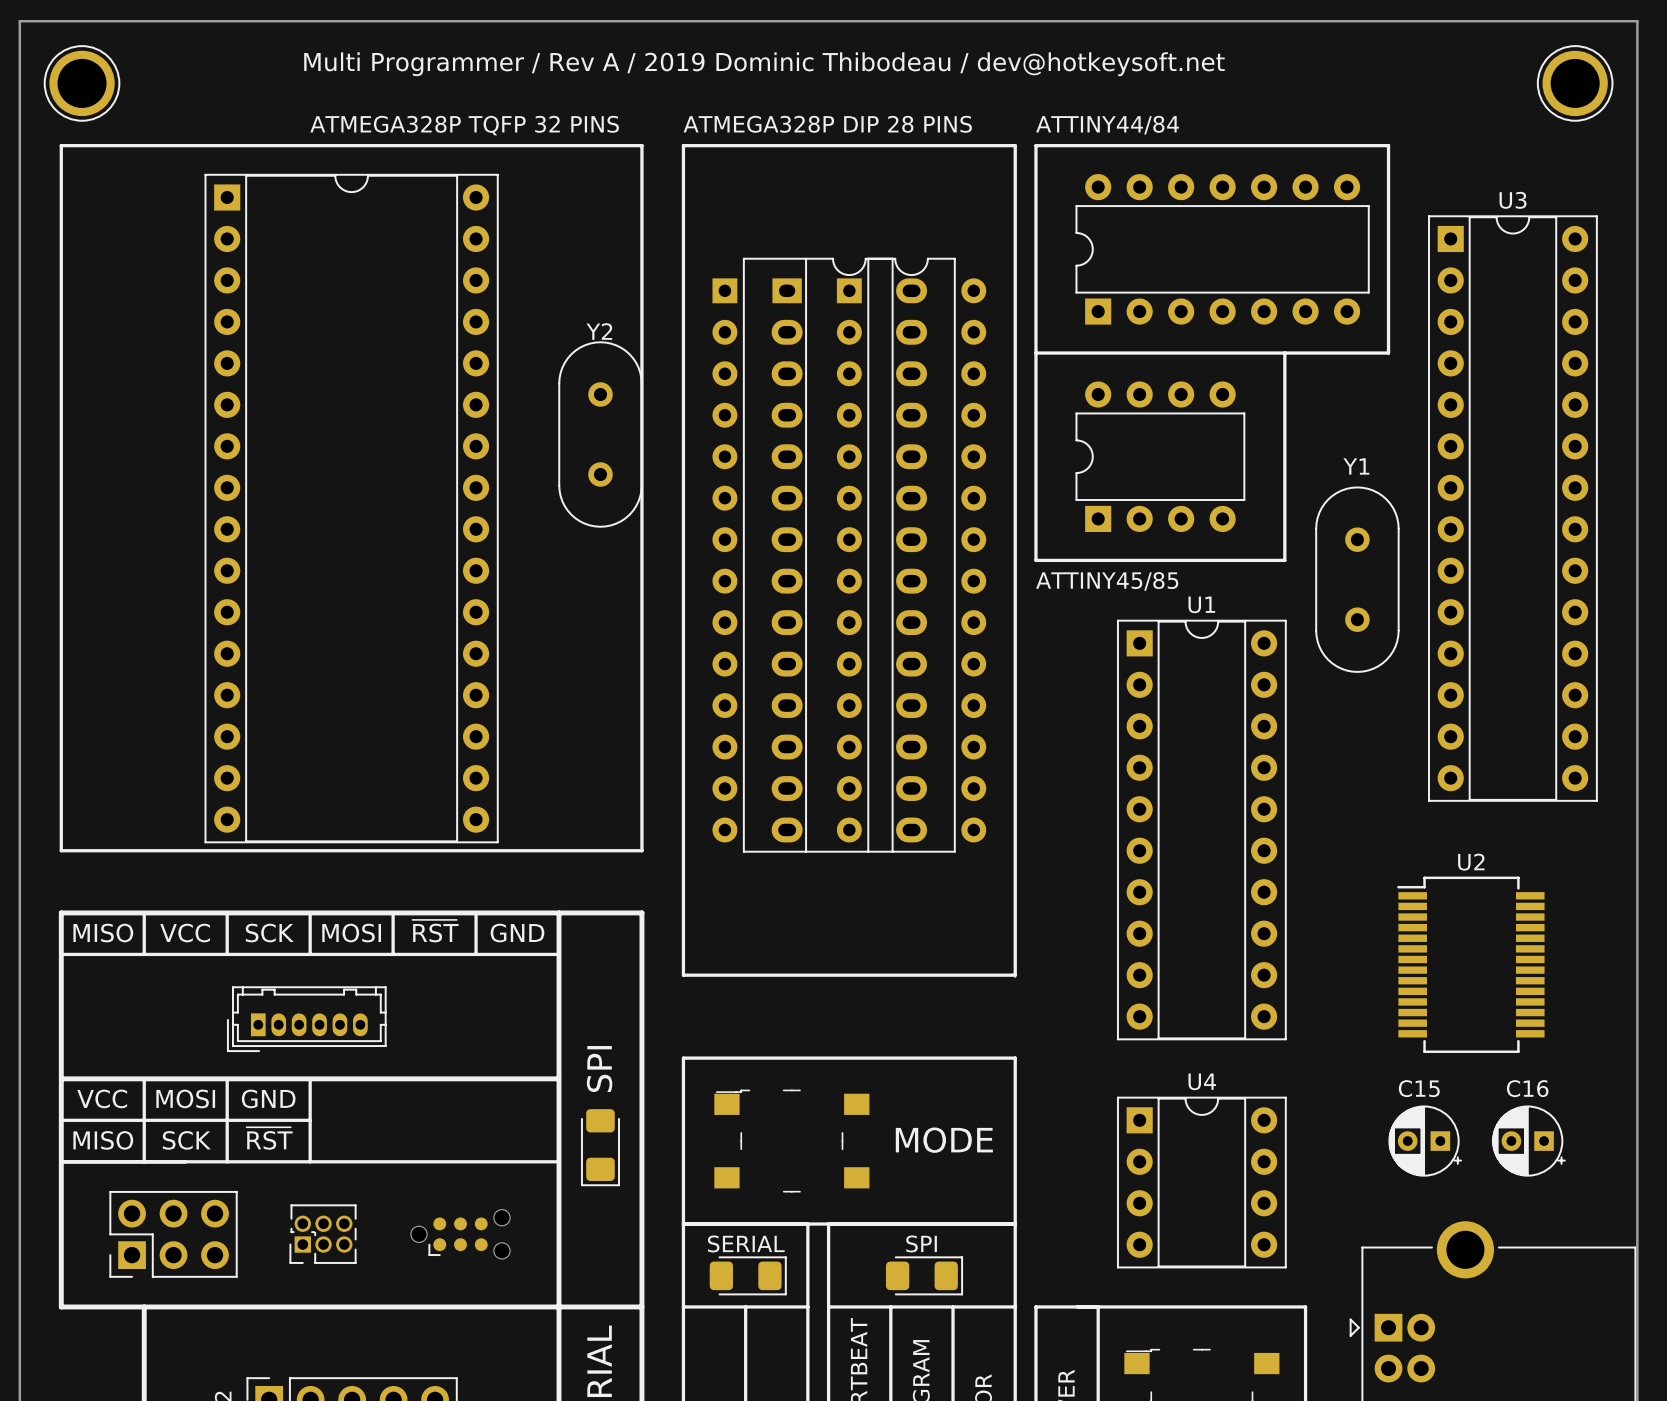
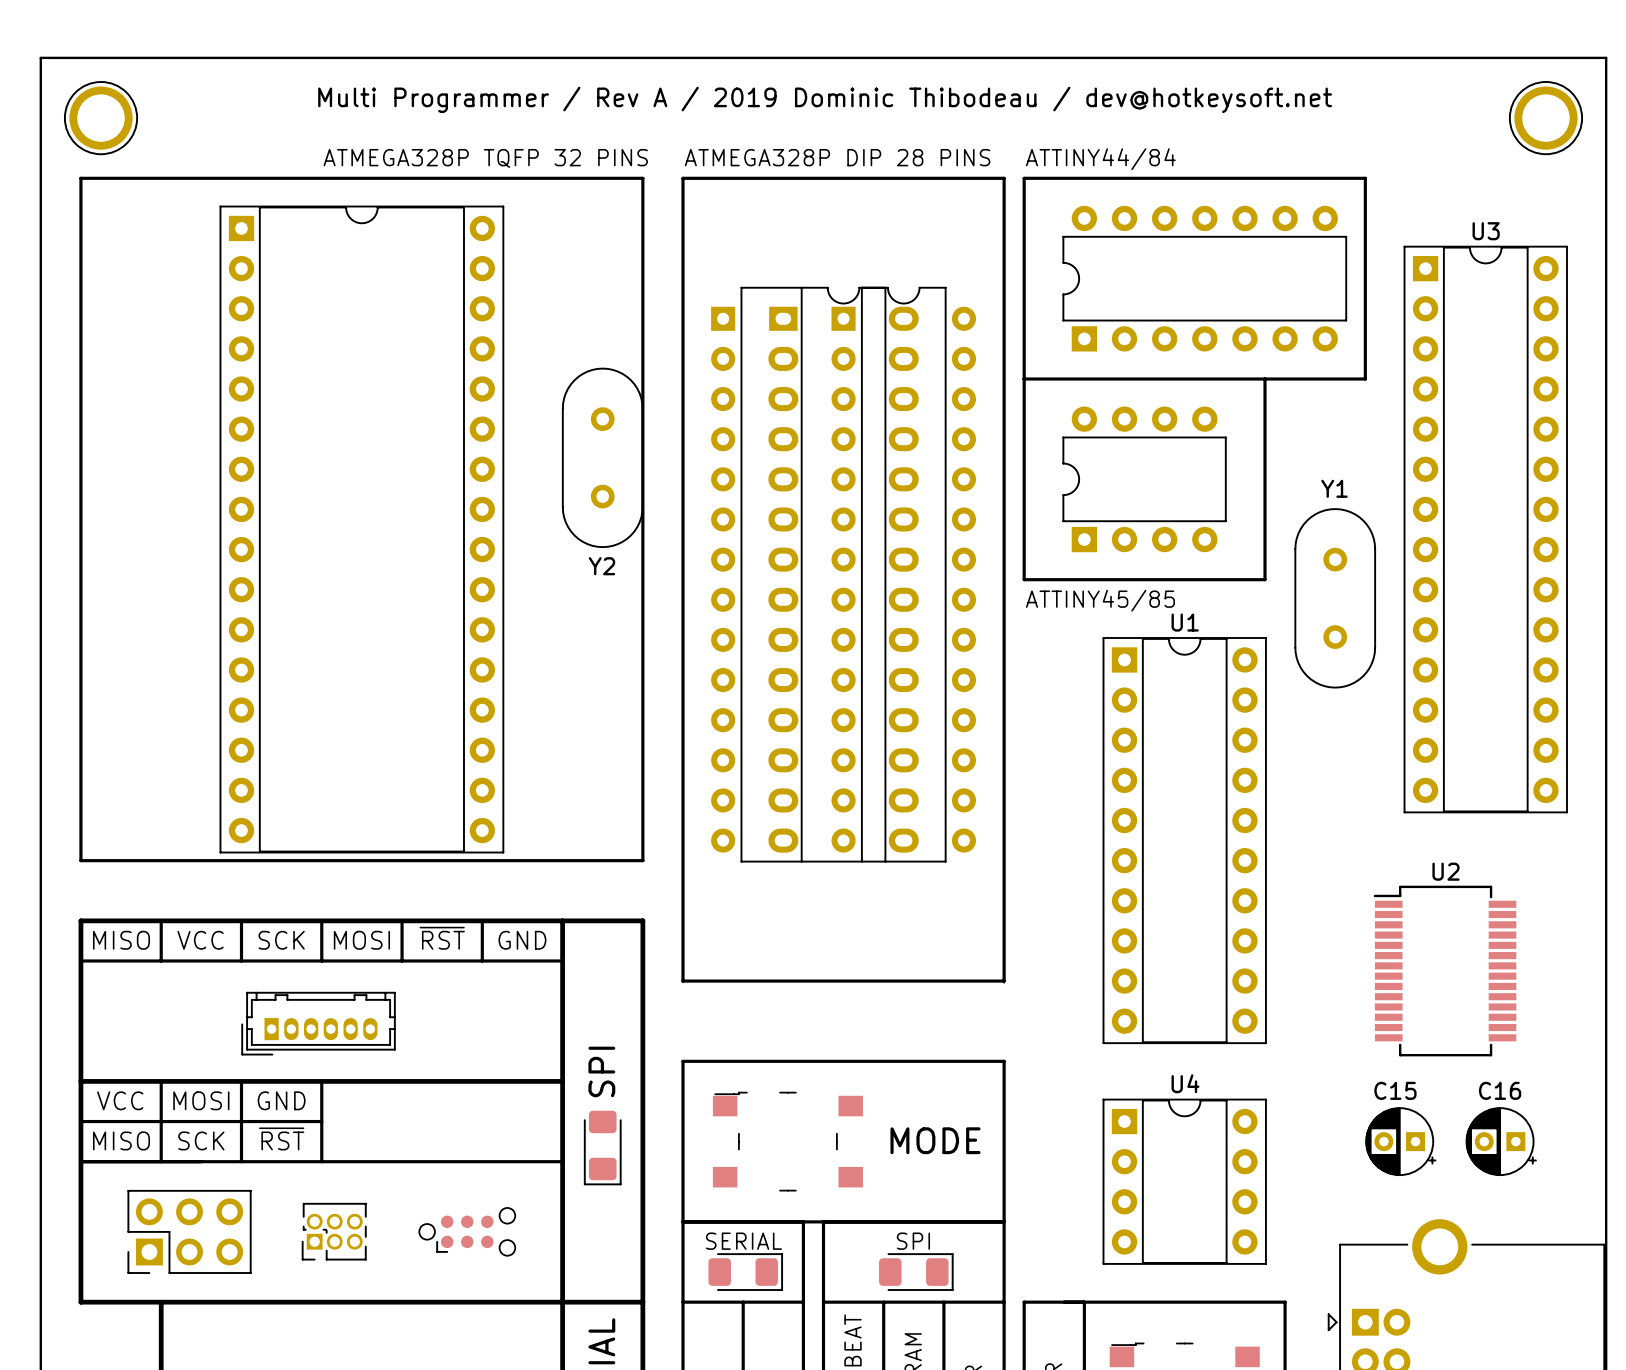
Y2 name position: Y2 (599, 331) -> Y2 (601, 566)

